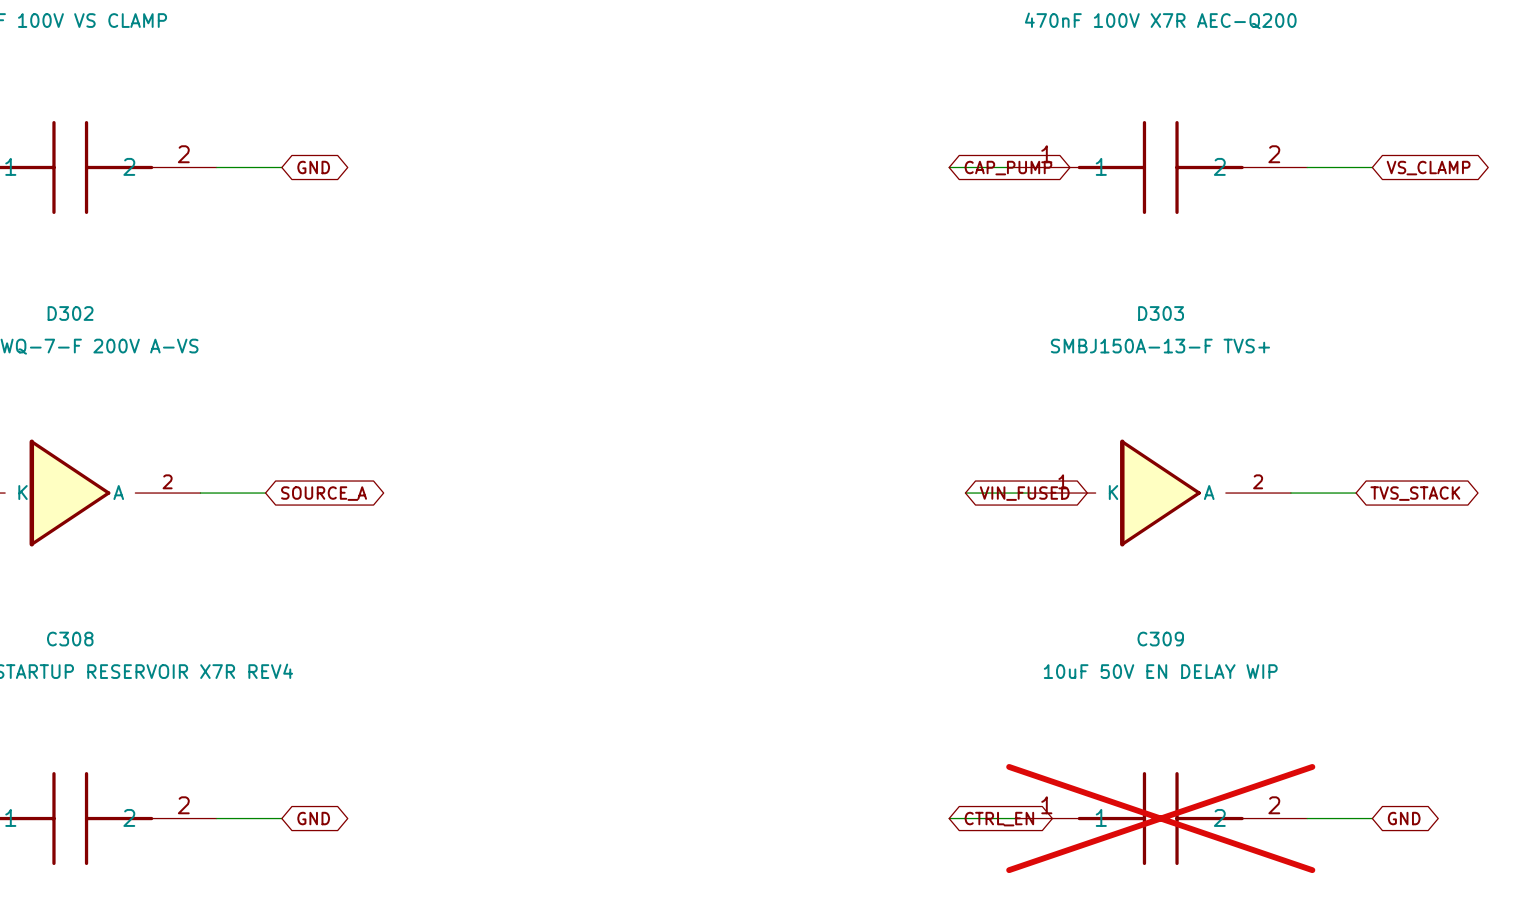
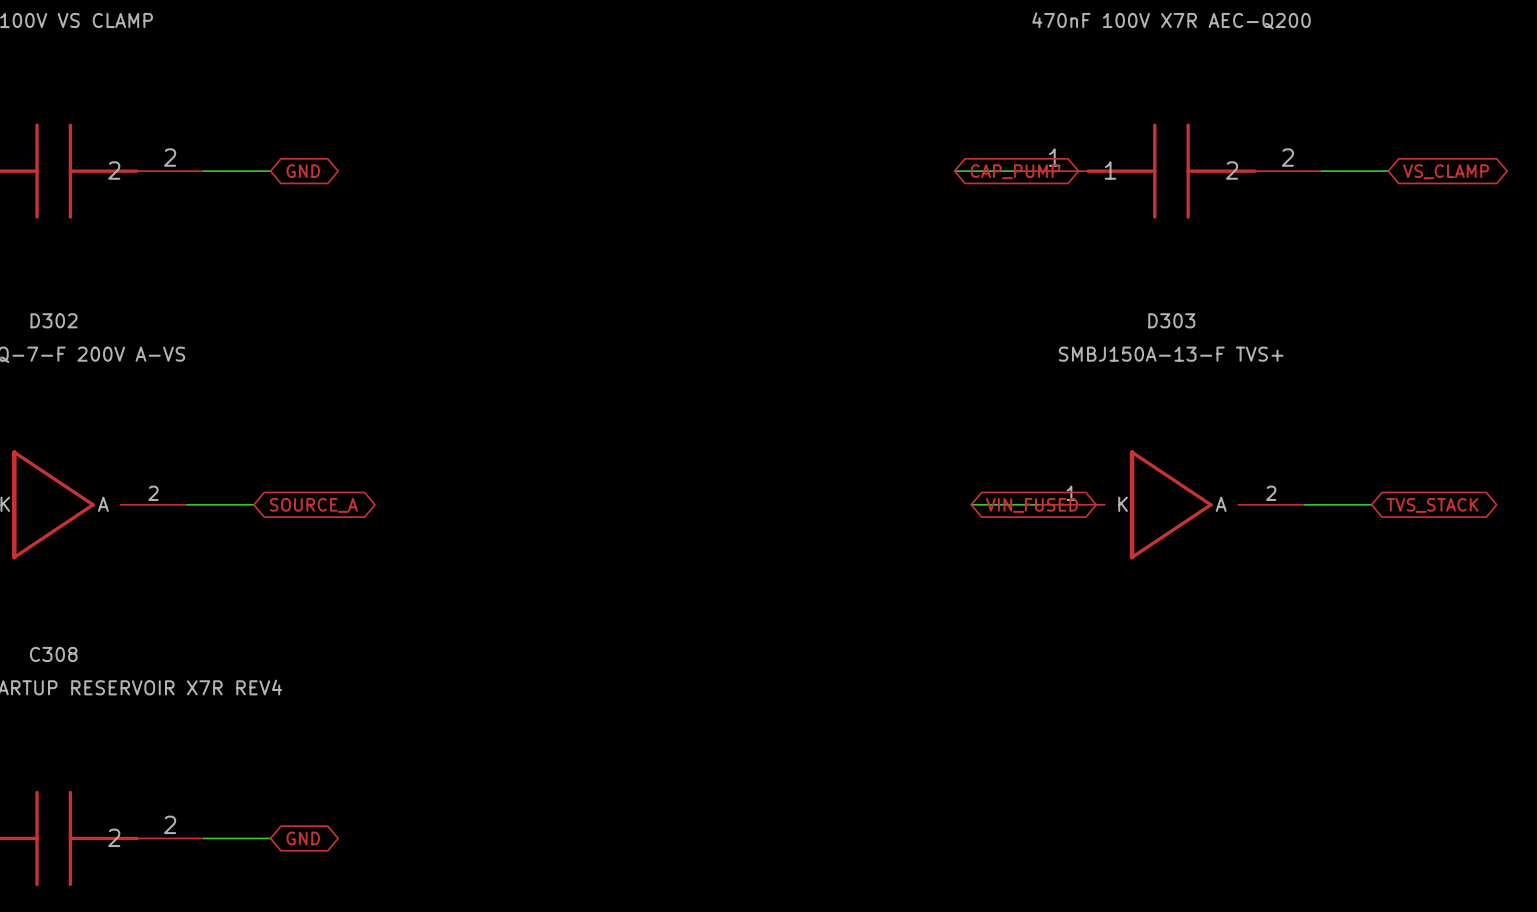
wire: (949, 818) (1014, 818) -> none
C309: 10uF 50V EN DELAY WIP (1160, 818) -> none
wire: (1307, 818) (1372, 818) -> none
global label: GND (1404, 818) -> none
global label: CTRL_EN (999, 819) -> none

